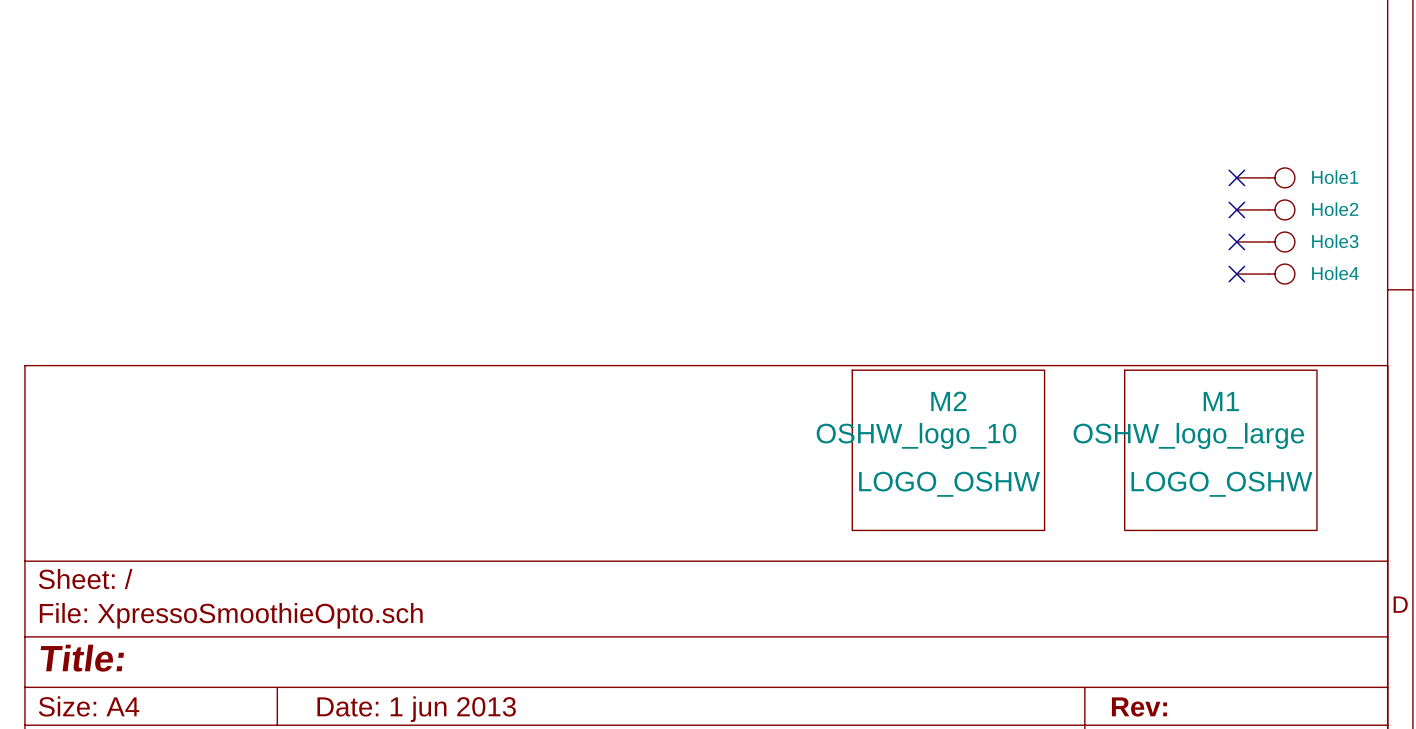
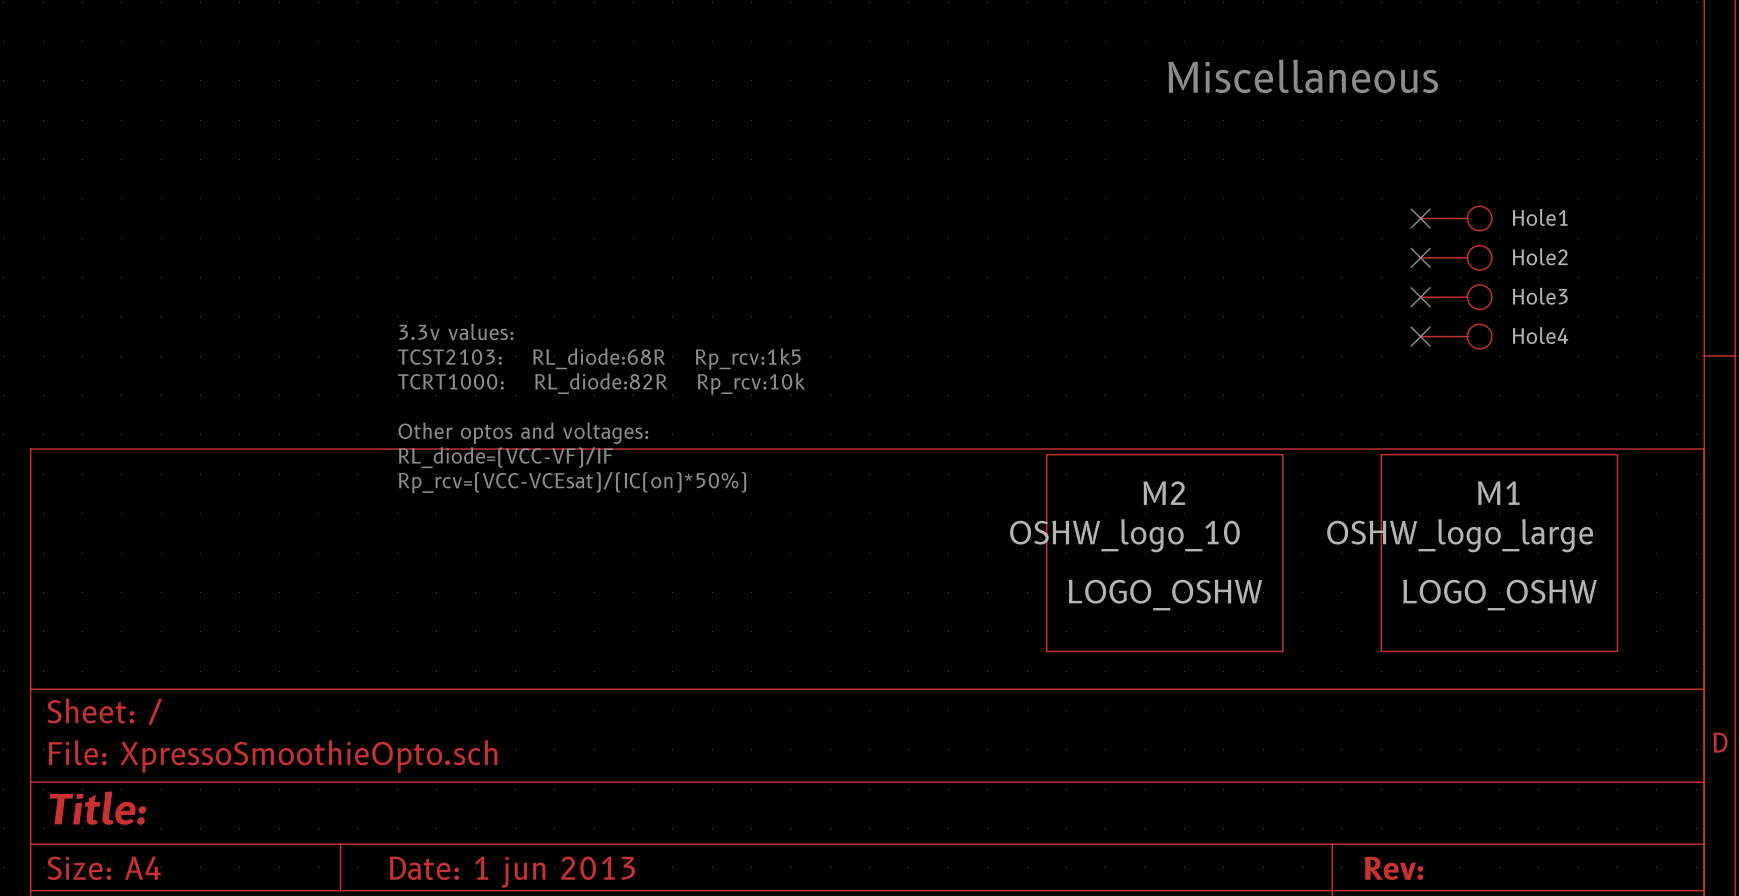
text: none -> Miscellaneous (1303, 76)
no-connect mark: none -> (1420, 218)
no-connect mark: (1236, 177) -> none
Hole1 position: (1265, 177) -> (1456, 218)
no-connect mark: none -> (1420, 257)
no-connect mark: (1236, 209) -> none
Hole2 position: (1265, 209) -> (1456, 257)
no-connect mark: none -> (1420, 297)
no-connect mark: (1236, 242) -> none
Hole3 position: (1265, 242) -> (1456, 297)
text: none -> 3.3v values: (456, 331)
no-connect mark: none -> (1420, 336)
no-connect mark: (1236, 274) -> none
Hole4 position: (1265, 274) -> (1456, 336)
text: none -> TCST2103: RL_diode:68R Rp_rcv:1k5 (599, 359)
text: none -> TCRT1000: RL_diode:82R Rp_rcv:10k (601, 383)
text: none -> Other optos and voltages: (523, 433)
text: none -> RL_diode=(VCC-VF)/IF (505, 457)
text: none -> Rp_rcv=(VCC-VCEsat)/(IC(on)*50%) (572, 482)

